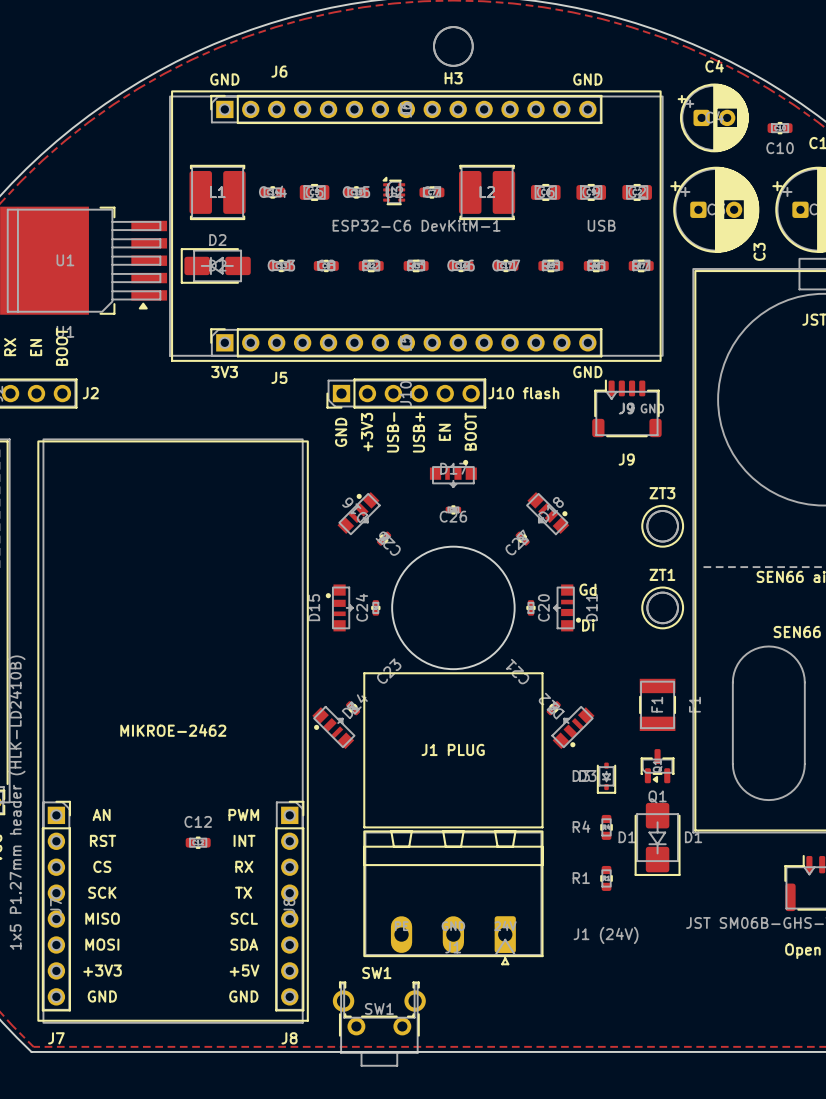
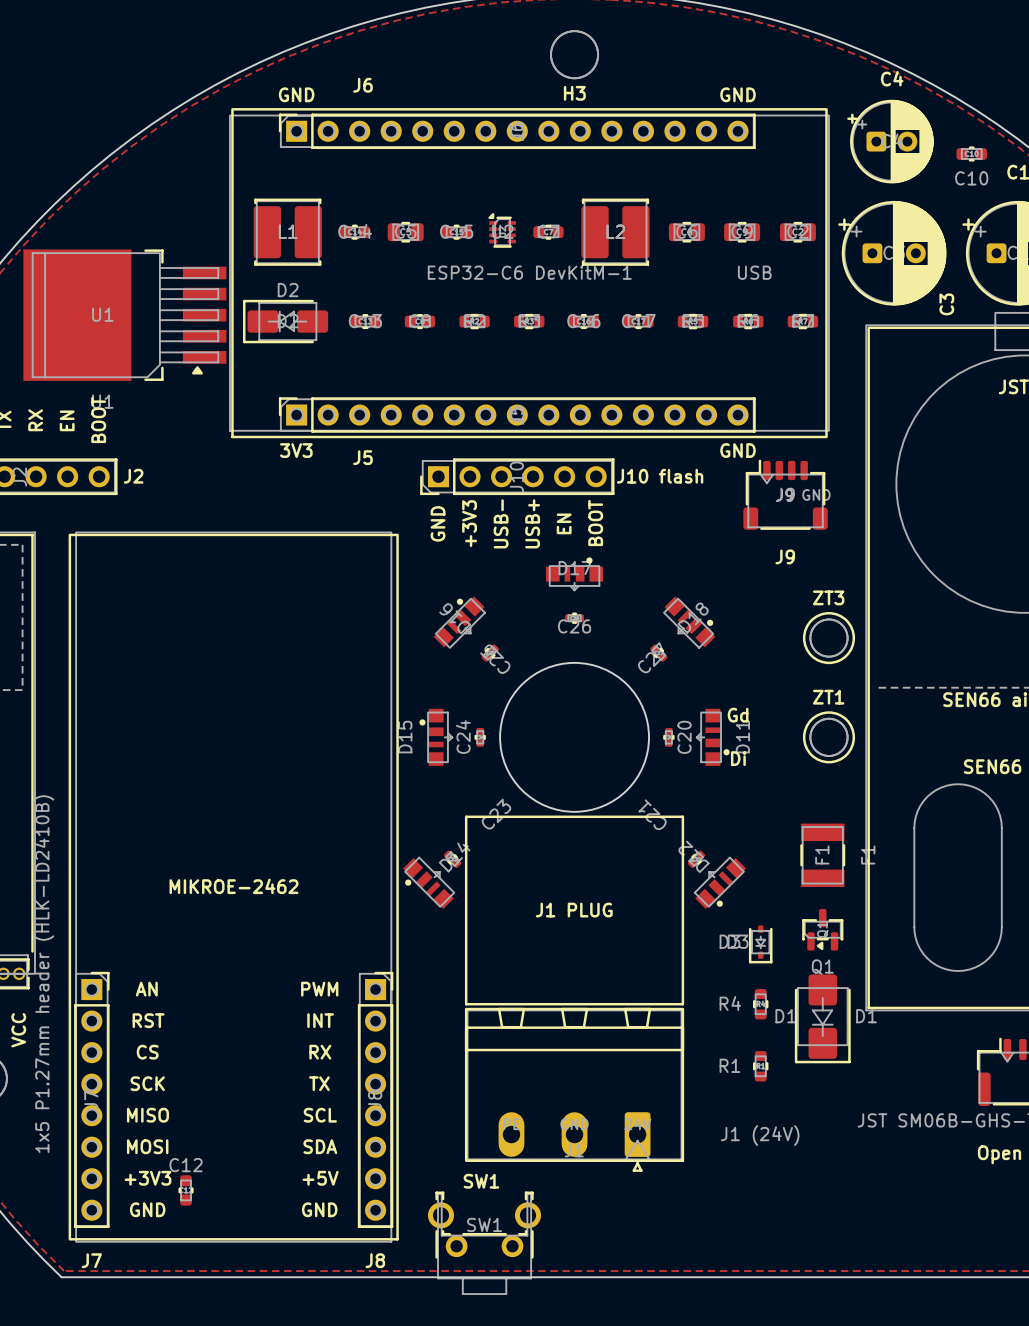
text position: C12 (198, 821) -> C12 (186, 1165)
part rotation: 0° (198, 842) -> 90° clockwise (186, 1190)
part position: (198, 842) -> (186, 1190)

